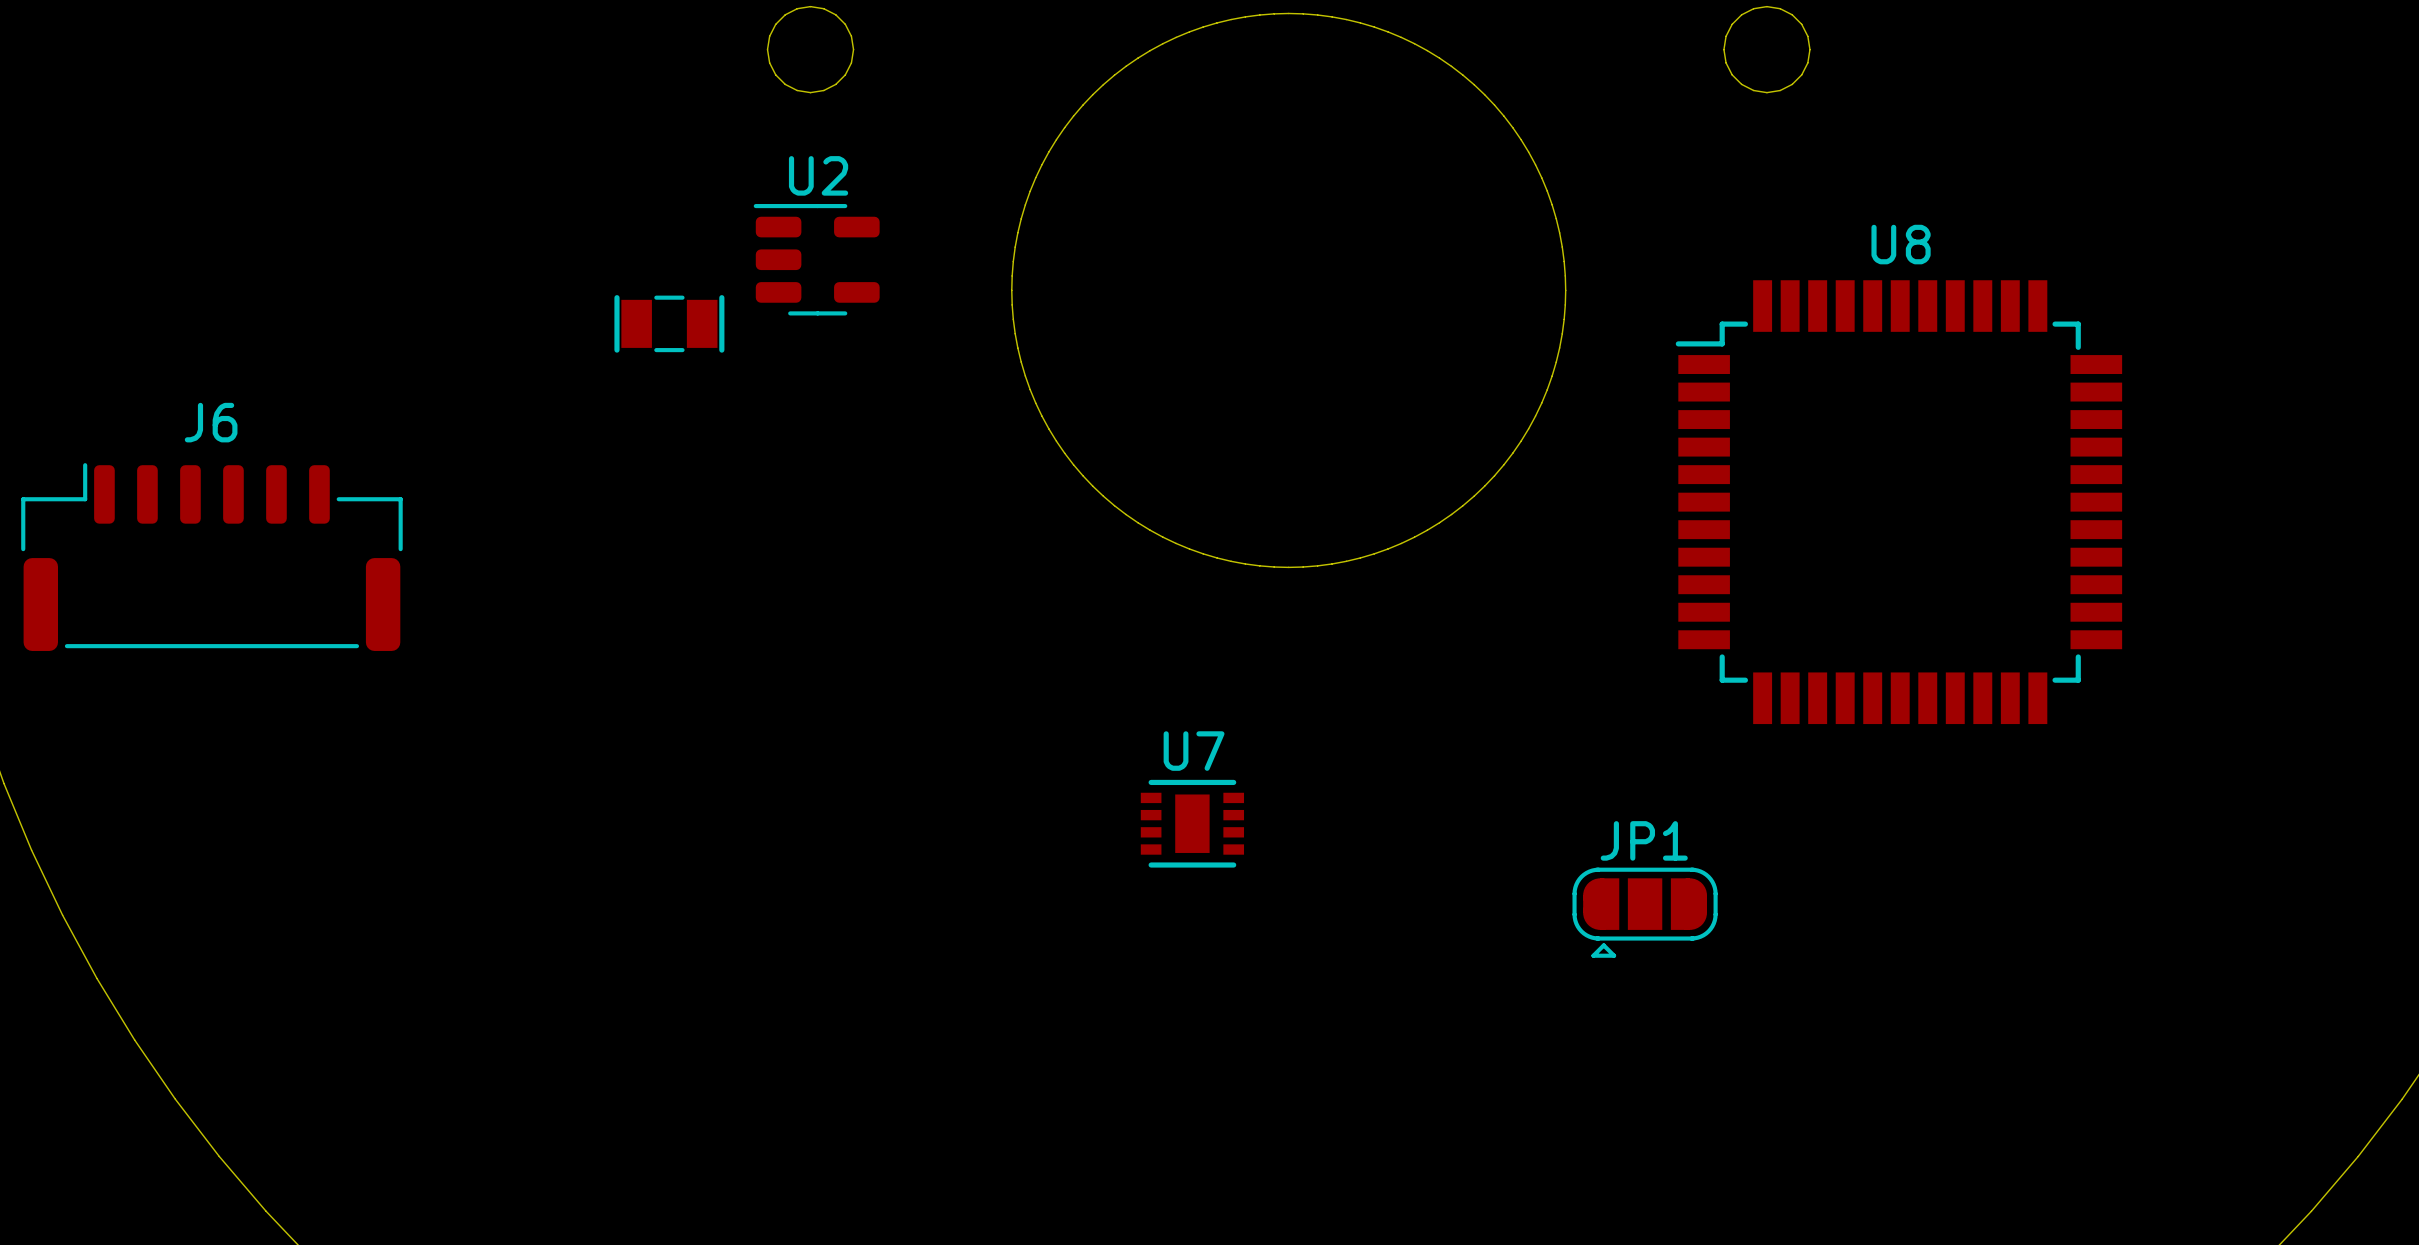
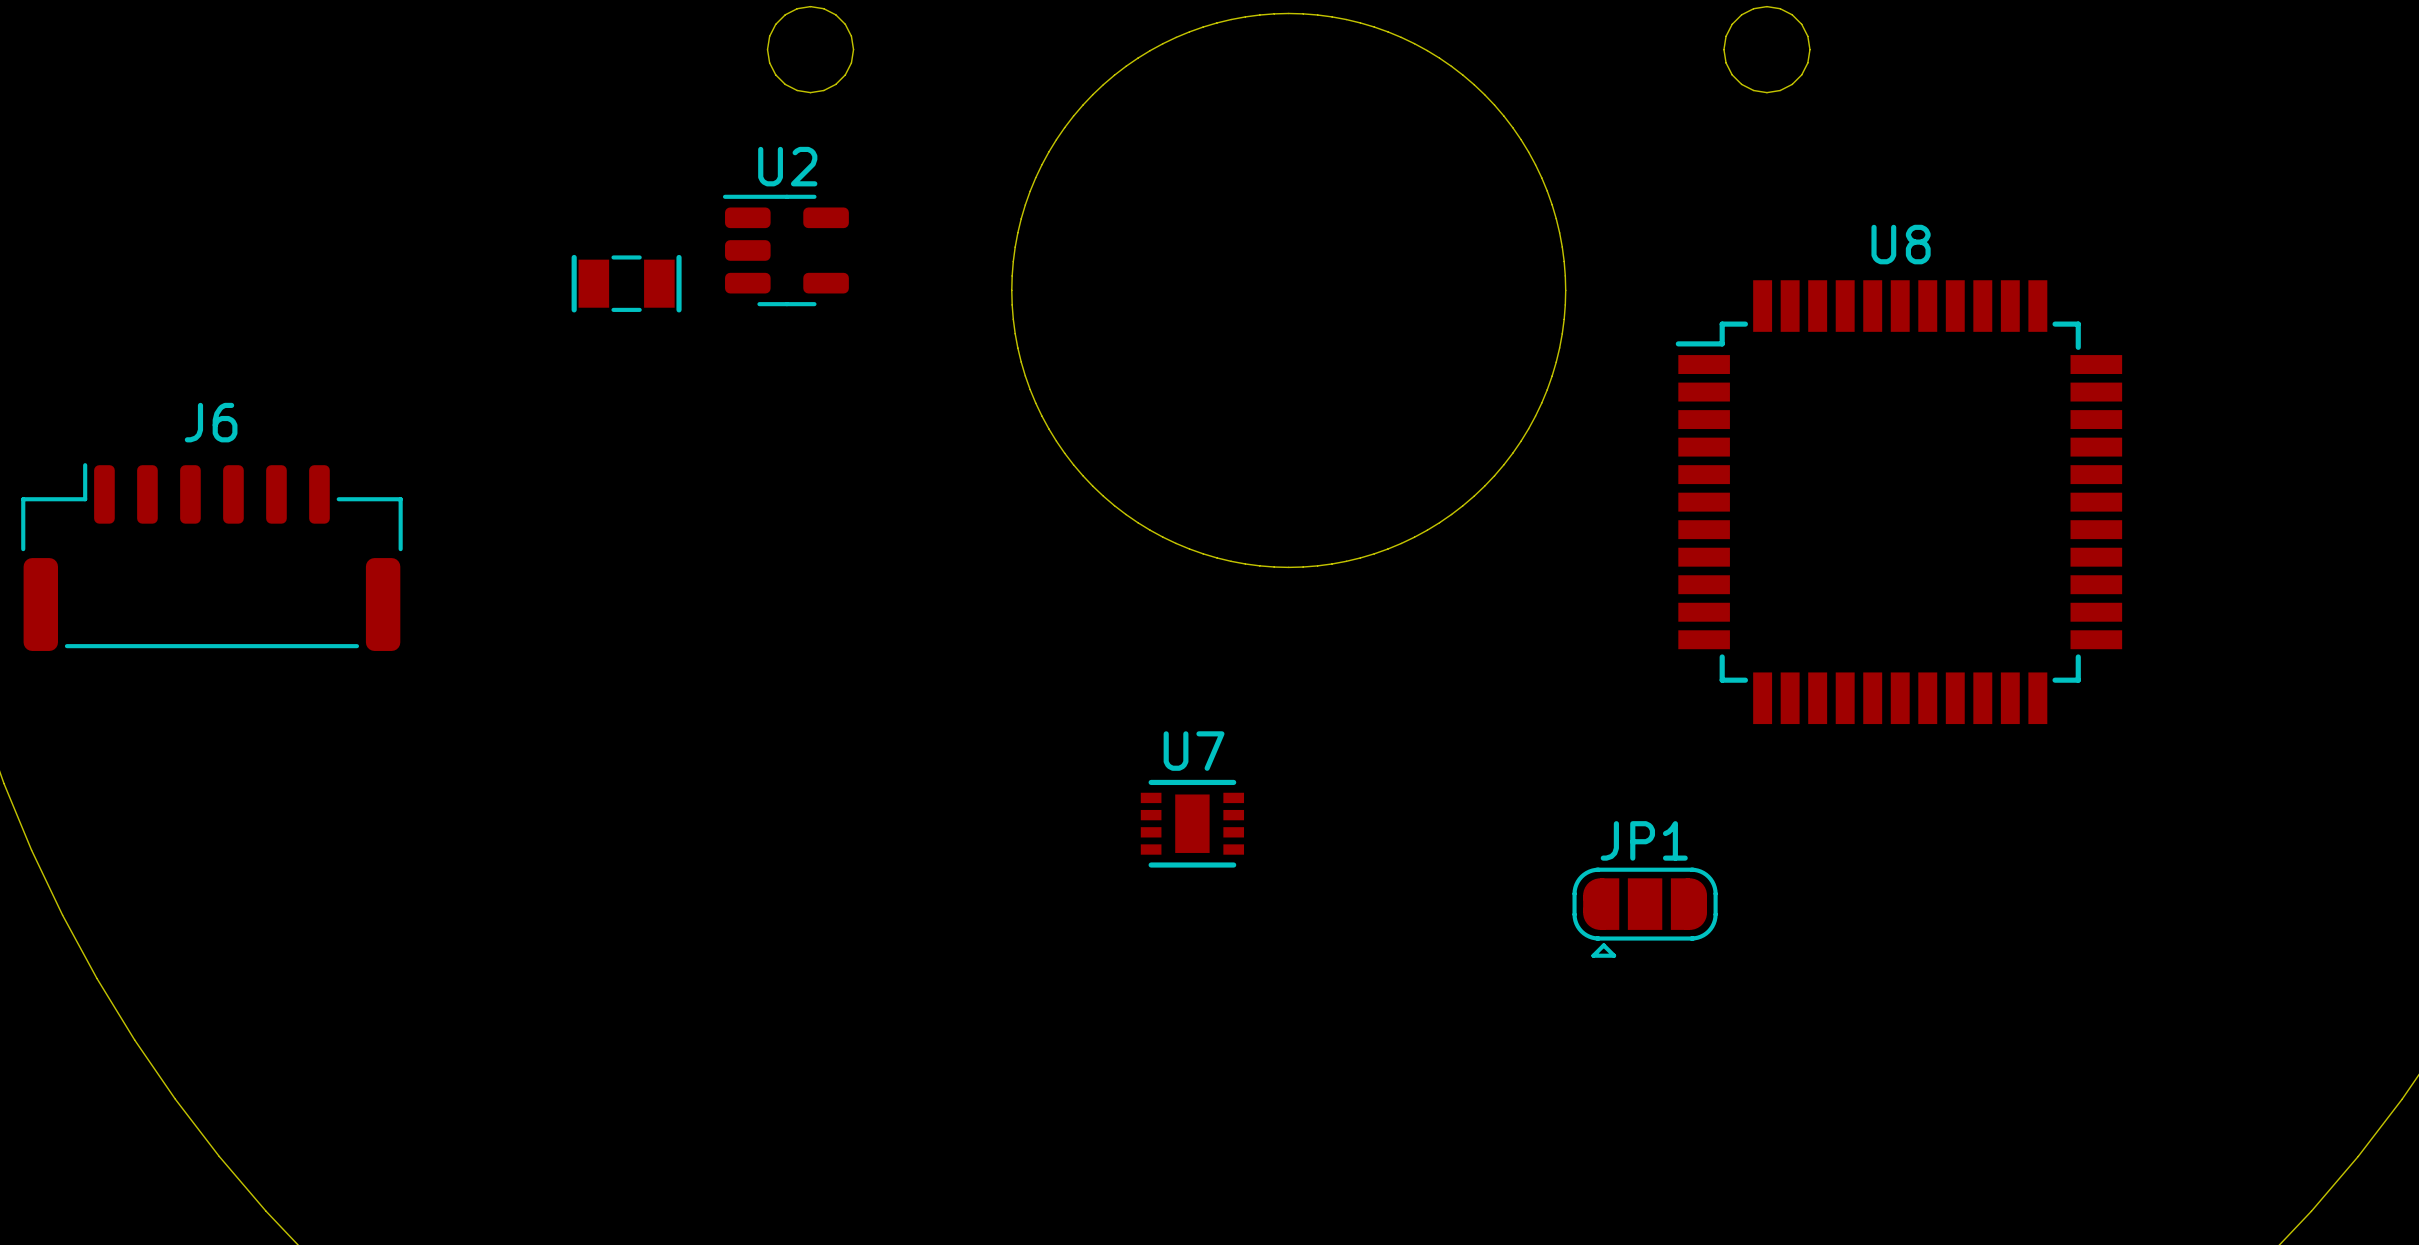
U2 position: (816, 259) -> (785, 250)
part position: (669, 323) -> (626, 283)

